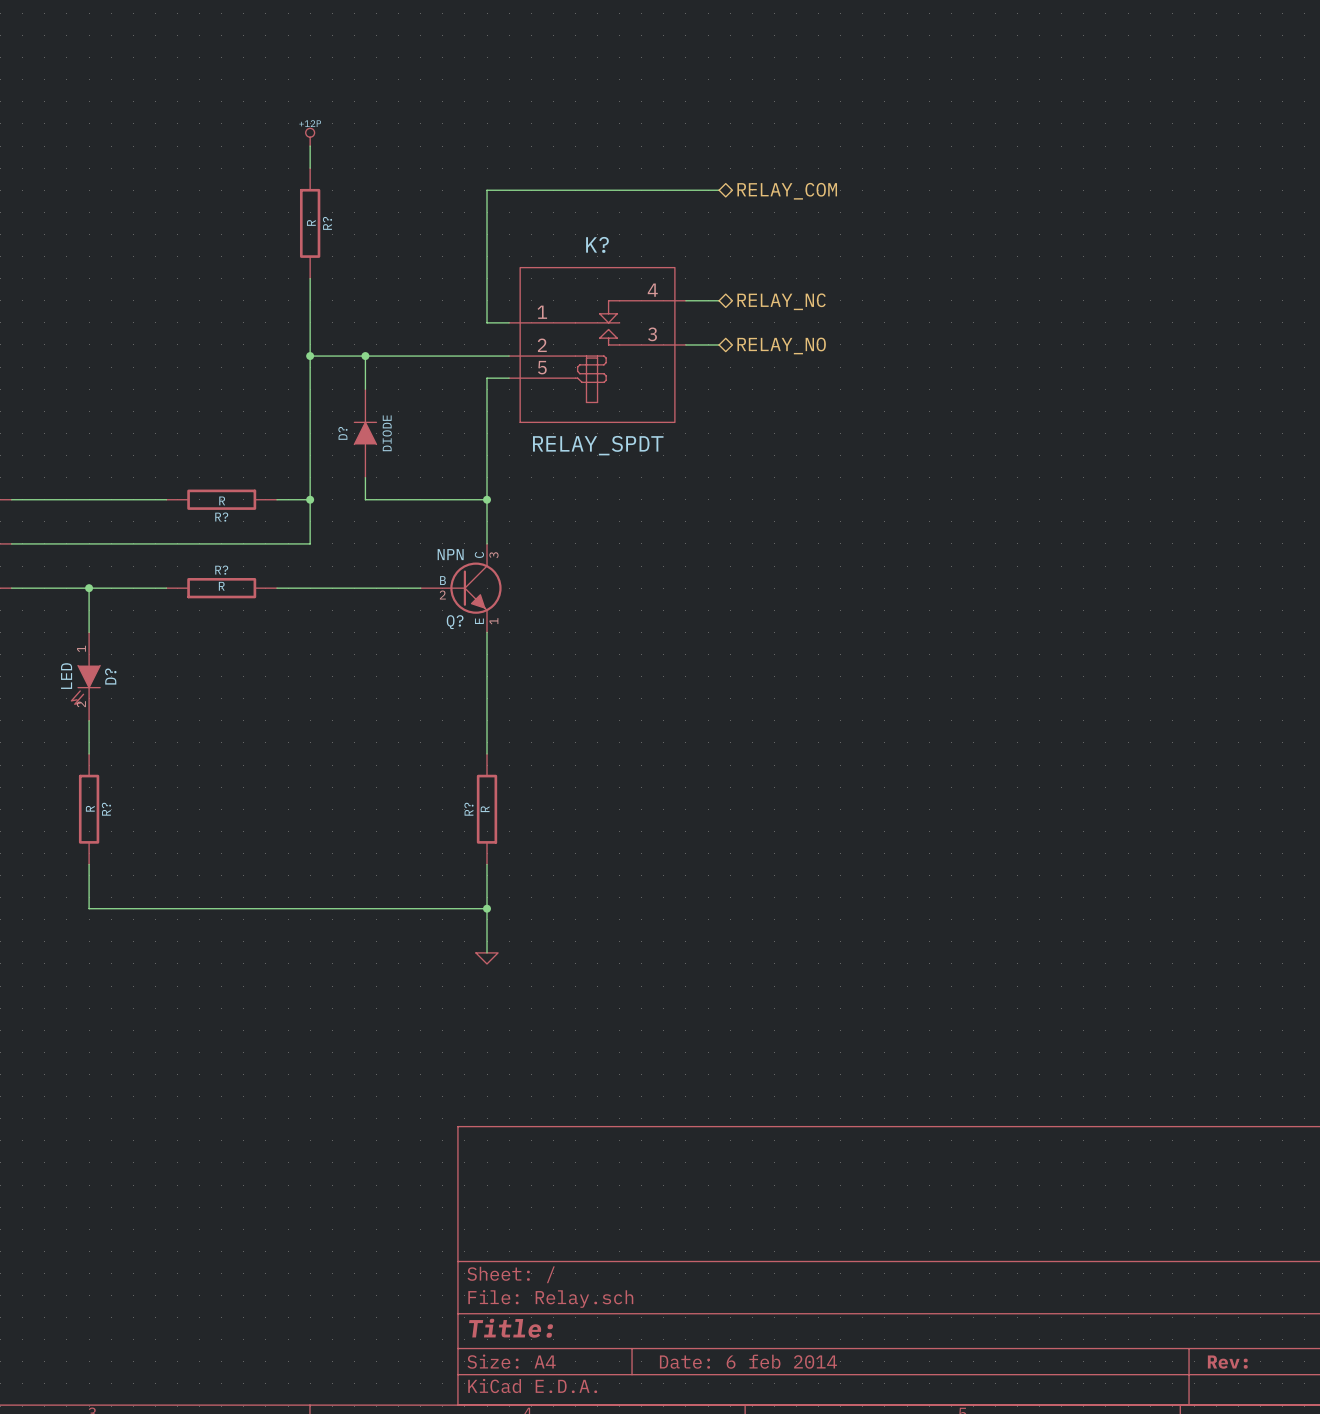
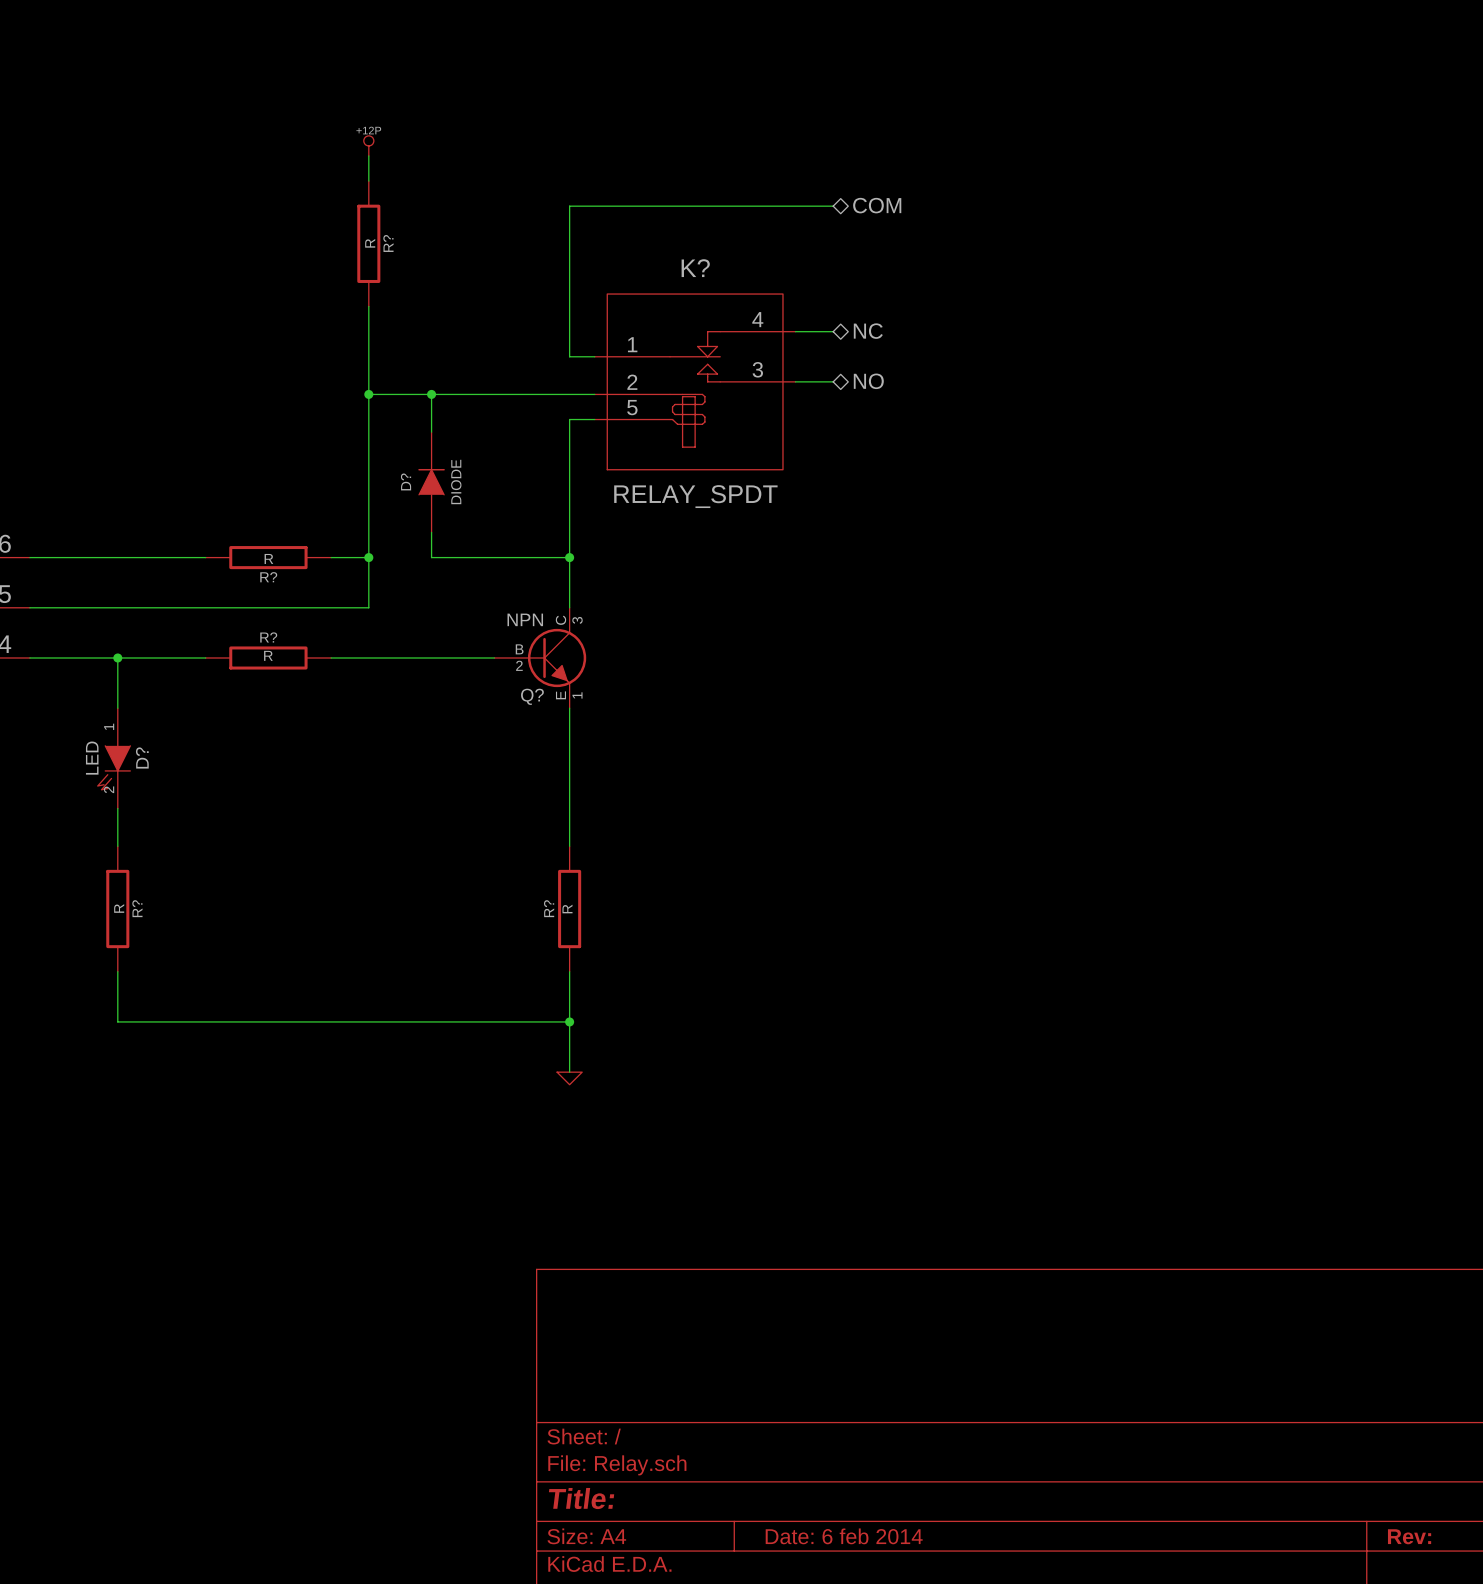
hierarchical label: RELAY_COM (787, 191) -> COM (877, 205)
hierarchical label: RELAY_NC (781, 301) -> NC (868, 331)
hierarchical label: RELAY_NO (781, 345) -> NO (868, 381)

